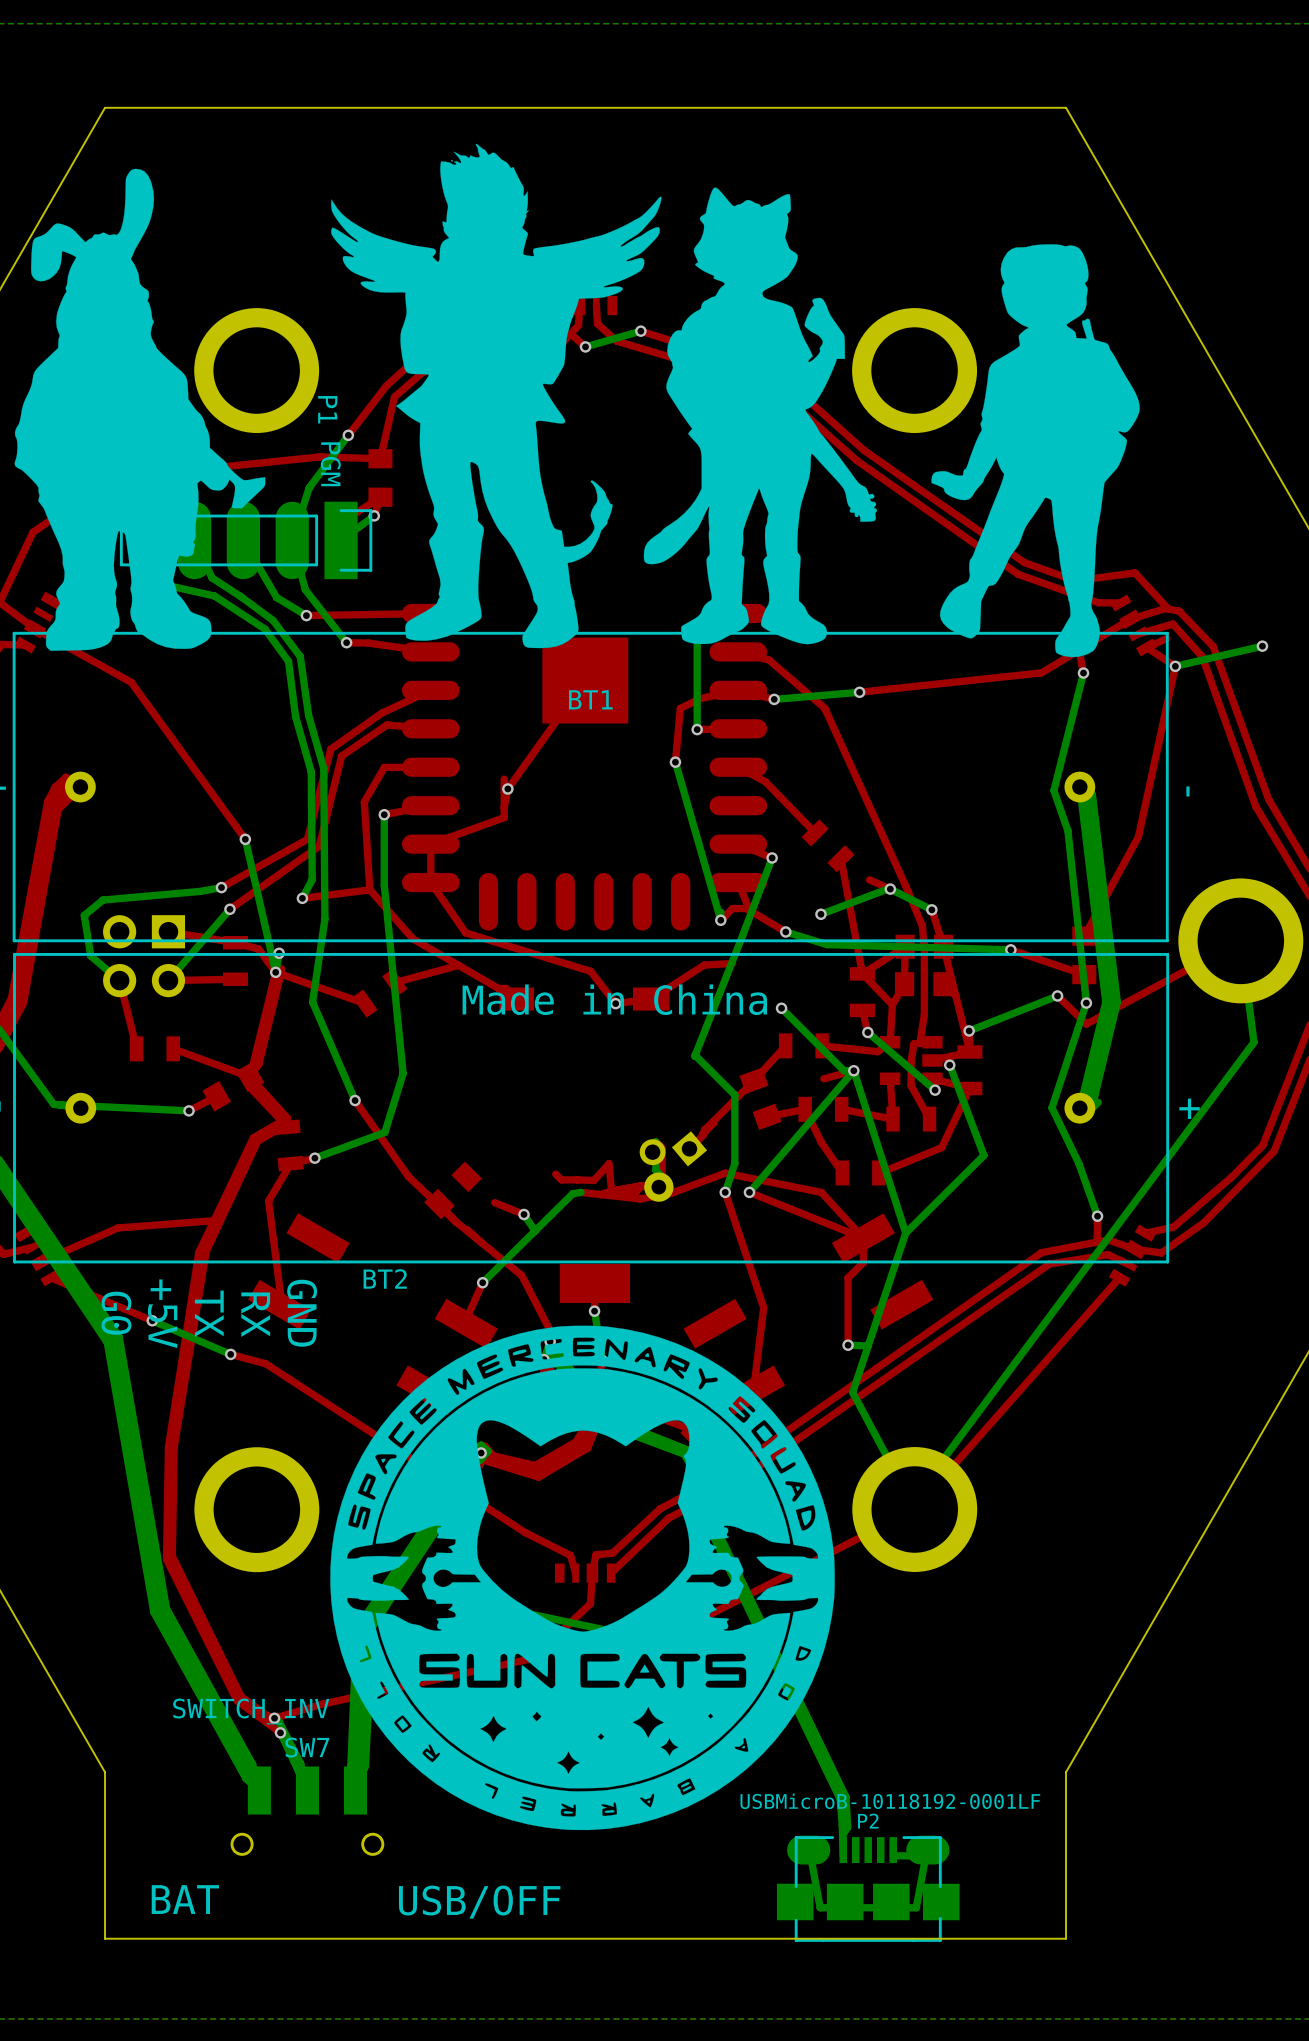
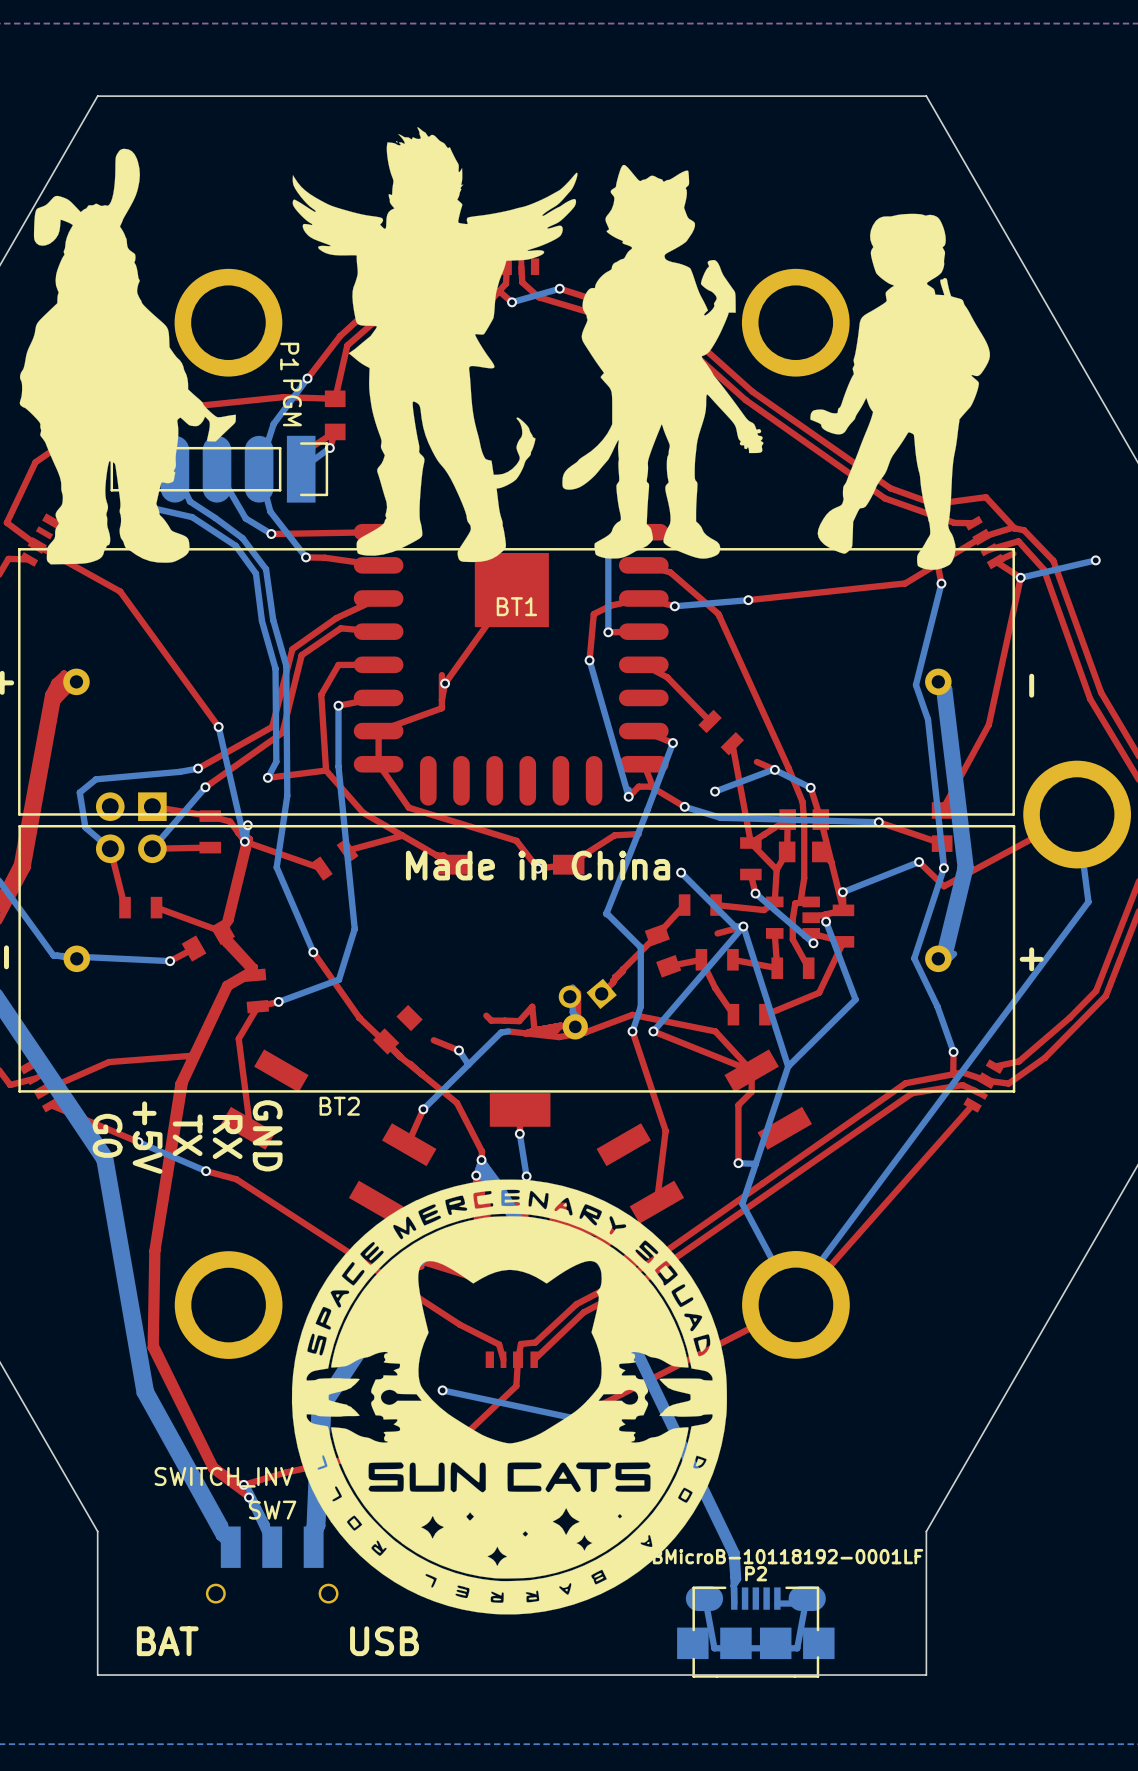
drawing position: (582, 1577) -> (509, 1397)
text: none -> USB (384, 1641)
text: USB/OFF (479, 1902) -> none

